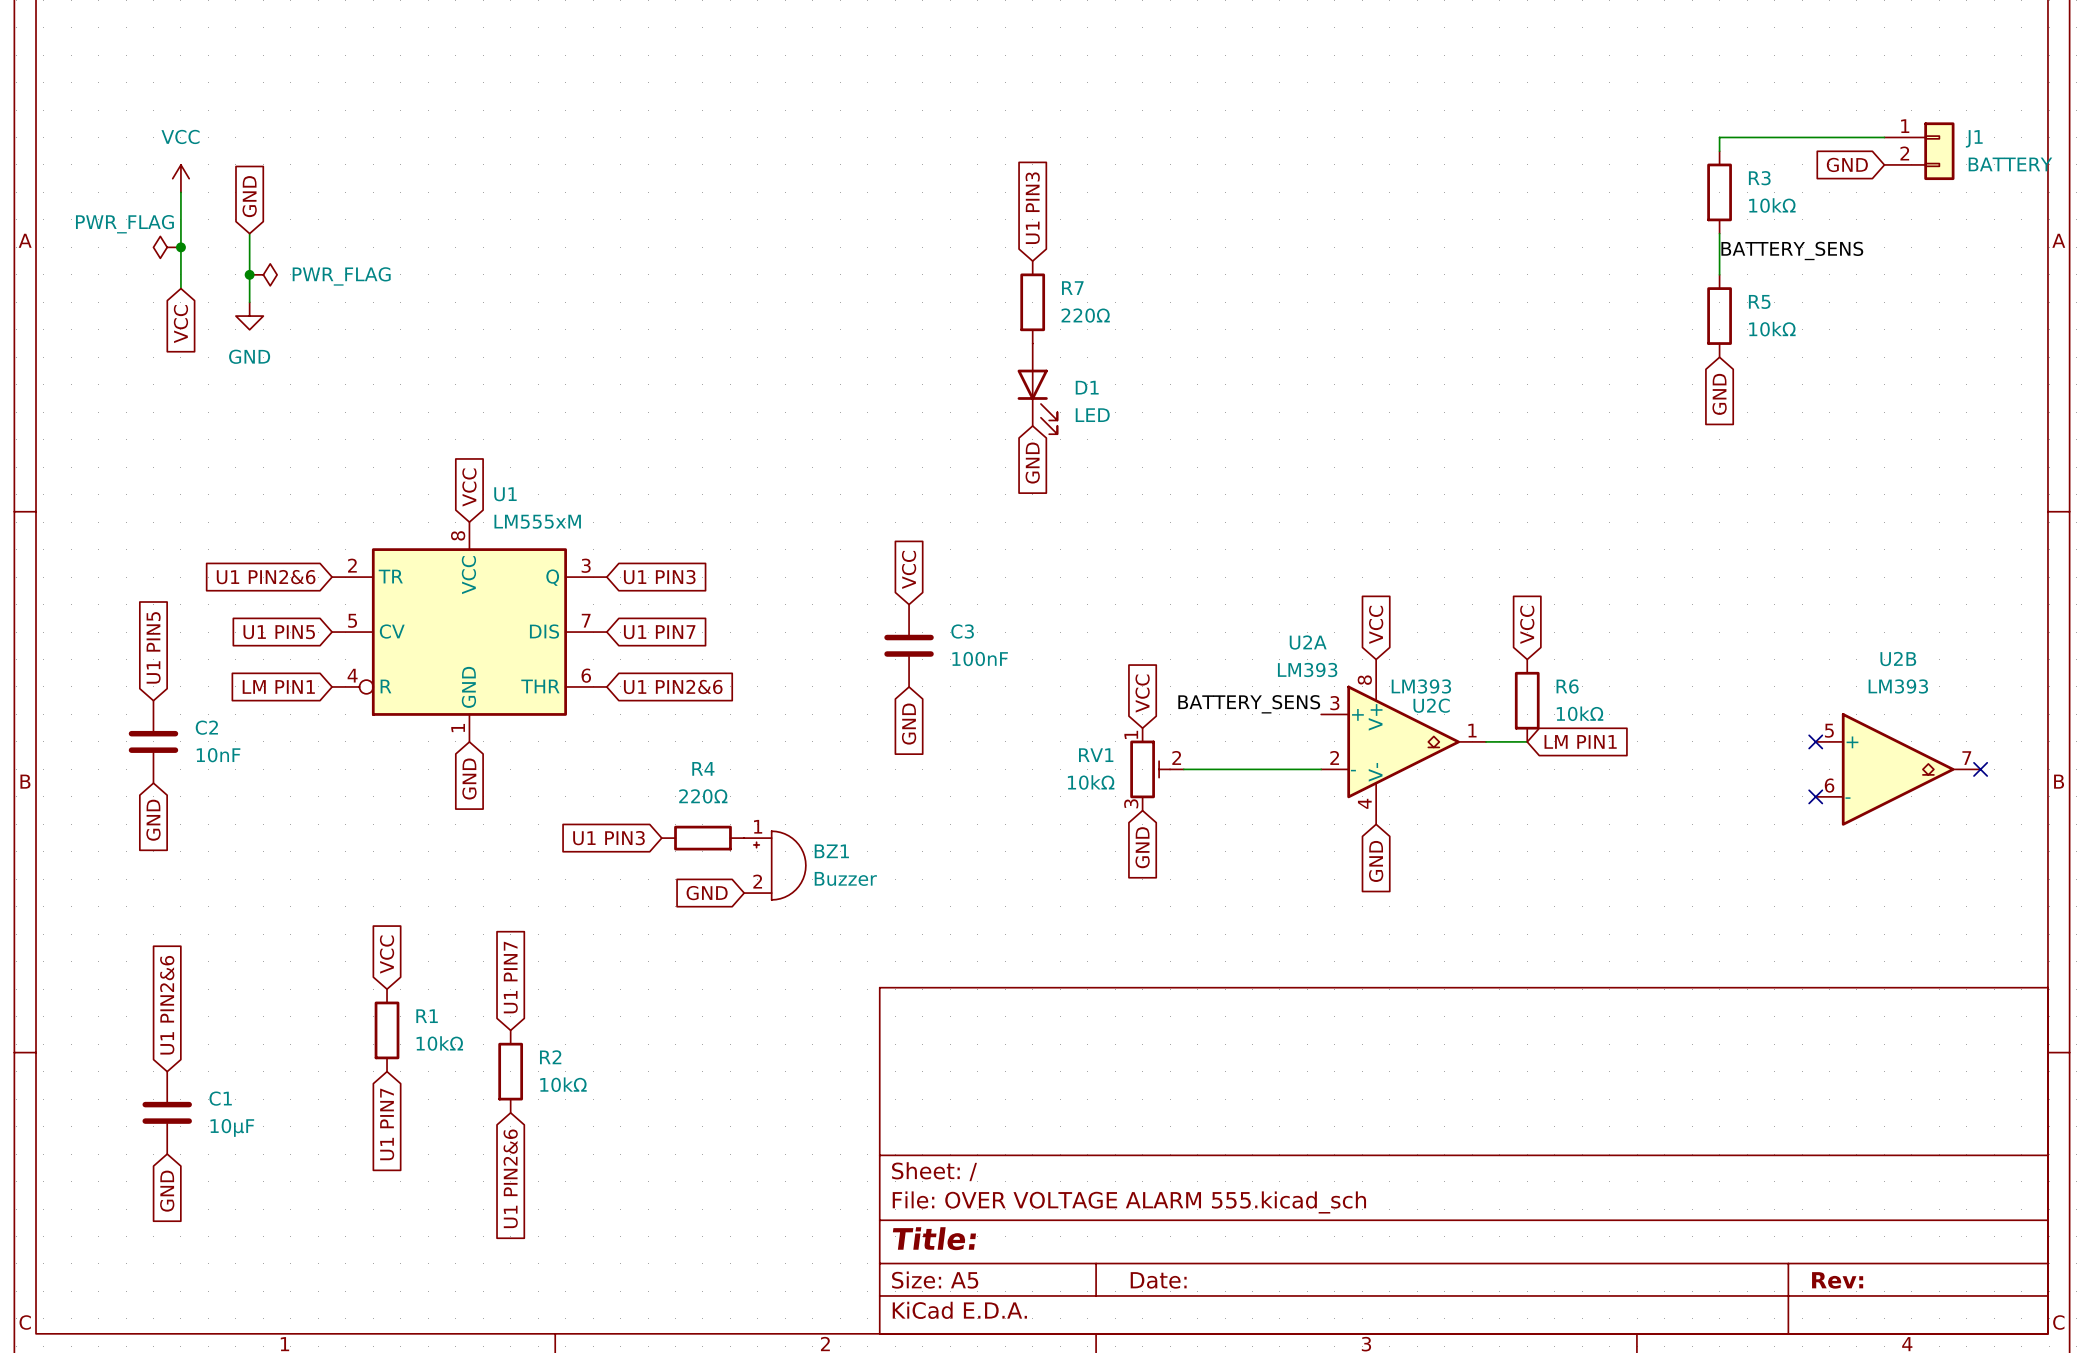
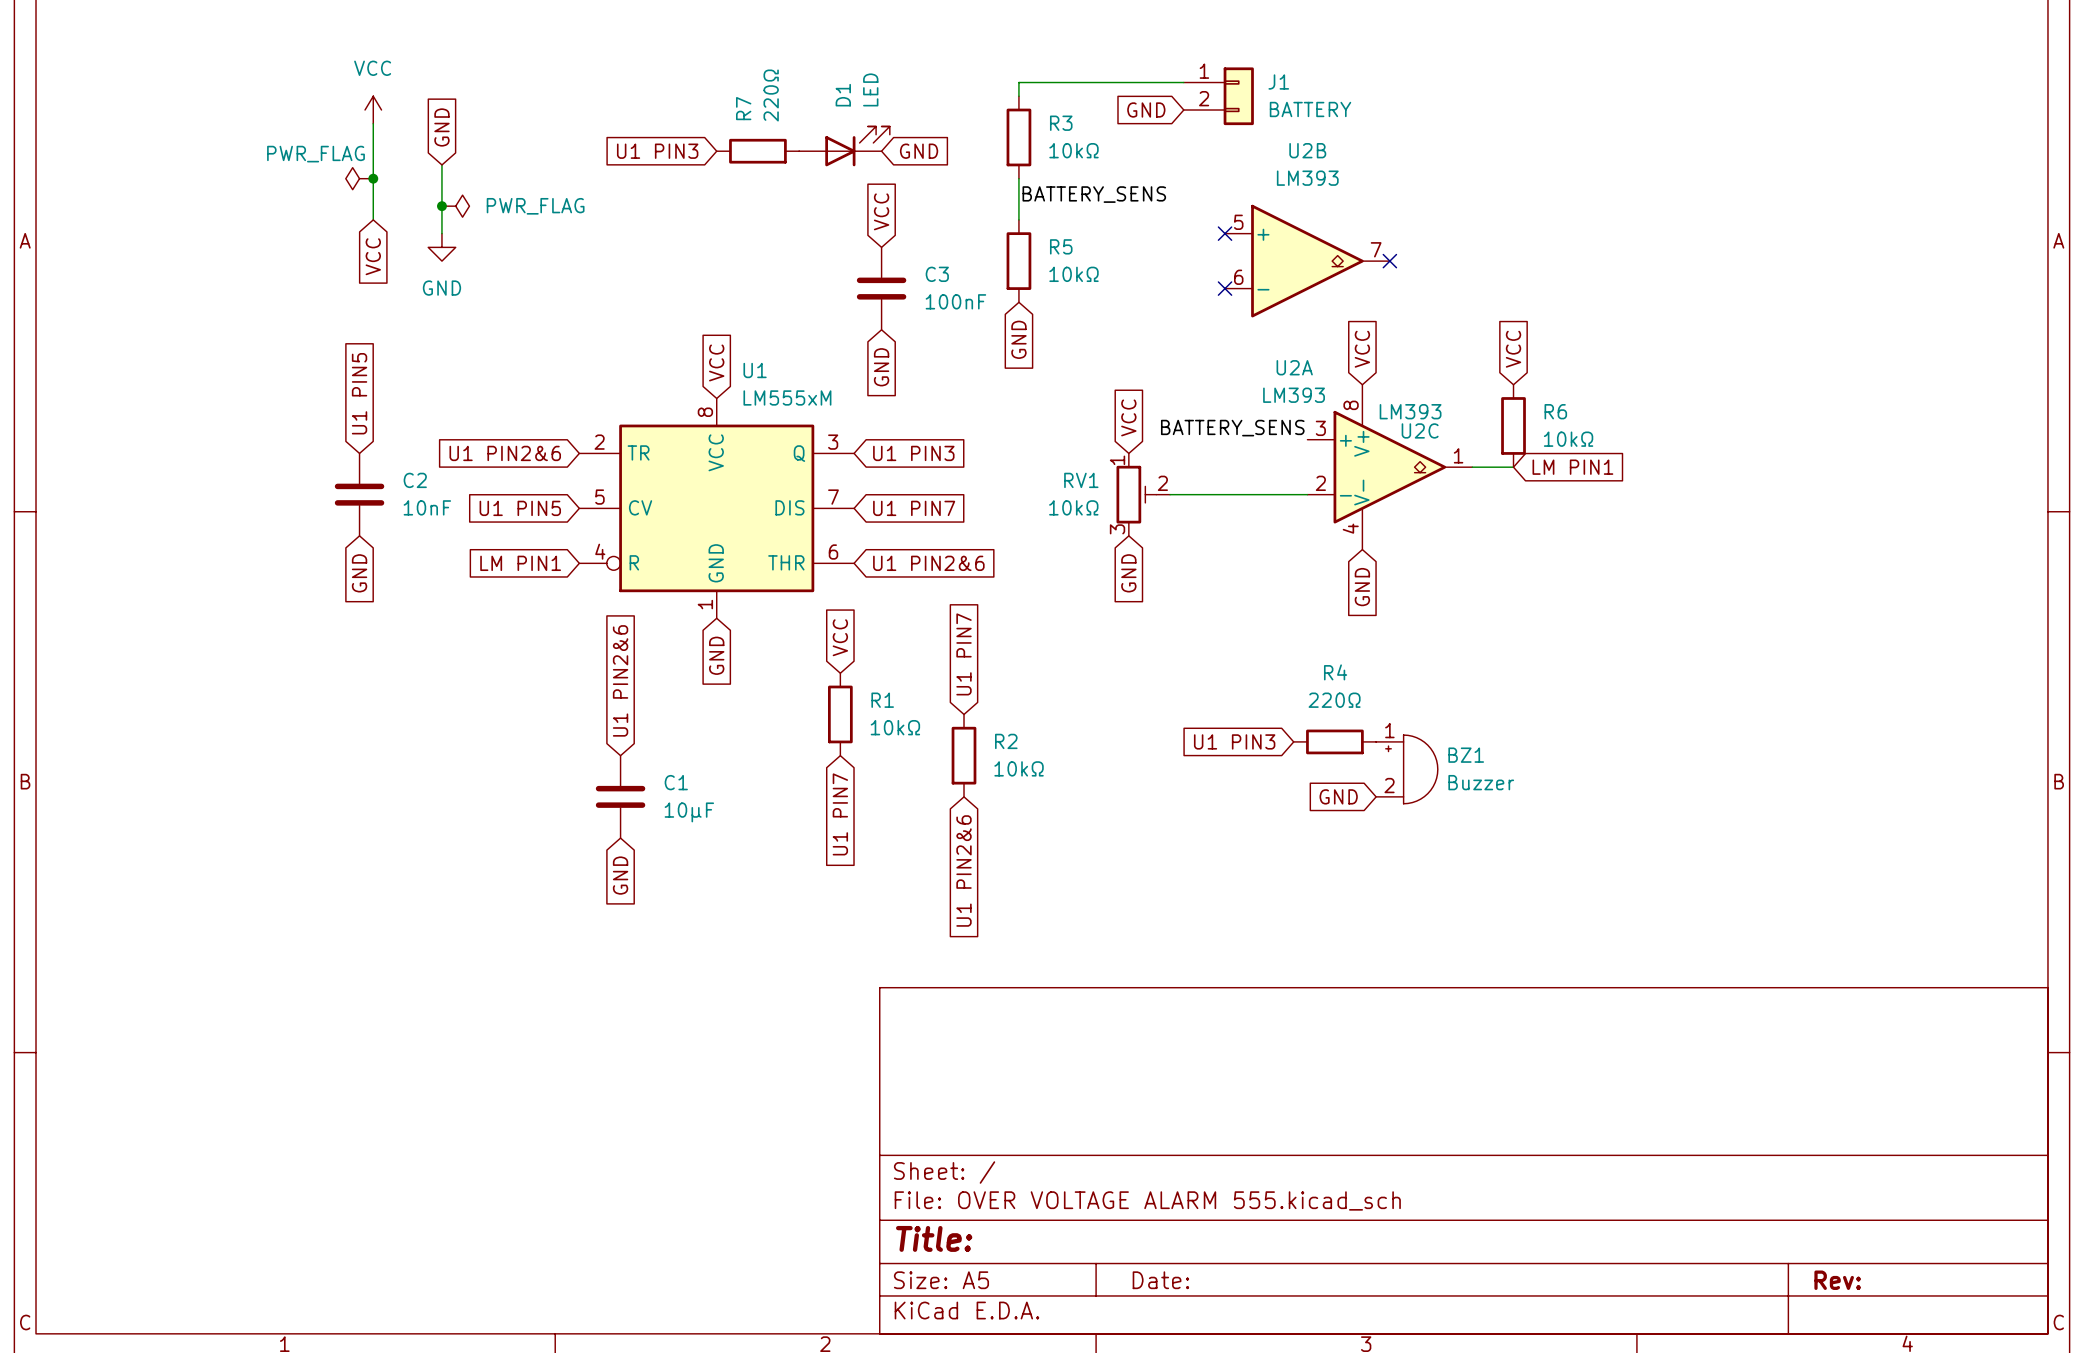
wire: none -> (1183, 82) (1018, 82) (1018, 96)
global label: none -> GND (1146, 110)
global label: none -> GND (441, 127)
wire: (1884, 137) (1719, 137) (1719, 151) -> none
global label: none -> U1 PIN3 (657, 151)
global label: none -> GND (919, 151)
J1 position: (1919, 151) -> (1218, 96)
global label: GND (1847, 164) -> none
power symbol position: VCC (180, 178) -> VCC (373, 110)
power symbol: none -> PWR_FLAG (359, 178)
junction: none -> (373, 178)
wire: (180, 192) (180, 288) -> (373, 123) (373, 219)
R3 position: (1719, 192) -> (1018, 137)
global label: GND (249, 196) -> none
label: none -> BATTERY_SENS (1094, 194)
junction: none -> (441, 206)
power symbol: none -> PWR_FLAG (455, 206)
global label: U1 PIN3 (1032, 208) -> none
global label: none -> VCC (881, 211)
wire: (249, 233) (249, 302) -> (441, 164) (441, 233)
no-connect mark: none -> (1225, 233)
wire: (1719, 233) (1719, 274) -> none
power symbol: PWR_FLAG (167, 247) -> none
junction: (180, 247) -> none
label: BATTERY_SENS (1792, 250) -> none
global label: none -> VCC (373, 256)
no-connect mark: none -> (1389, 261)
junction: (249, 274) -> none
power symbol: PWR_FLAG (263, 274) -> none
R7 name position: R7 (1072, 288) -> R7 (743, 108)
no-connect mark: none -> (1225, 288)
R7 rotation: 0° (1032, 302) -> 90° clockwise (757, 151)
R7 position: (1032, 302) -> (757, 151)
R7 value position: 220Ω (1085, 315) -> 220Ω (771, 95)
power symbol position: GND (249, 316) -> GND (441, 247)
R5 position: (1719, 316) -> (1018, 261)
global label: VCC (180, 324) -> none
global label: none -> GND (1018, 339)
global label: none -> VCC (1362, 349)
global label: none -> VCC (1513, 349)
global label: none -> VCC (716, 362)
global label: none -> GND (881, 367)
D1 position: (1037, 388) -> (844, 146)
global label: GND (1719, 394) -> none
global label: none -> U1 PIN5 (359, 393)
D1 rotation: 0° (1037, 401) -> 90° counterclockwise (857, 146)
global label: none -> VCC (1128, 417)
label: none -> BATTERY_SENS (1232, 428)
global label: none -> U1 PIN2&6 (505, 453)
global label: none -> U1 PIN3 (913, 453)
global label: GND (1032, 463) -> none
wire: none -> (1472, 467) (1513, 467)
global label: none -> LM PIN1 (1572, 467)
global label: VCC (469, 487) -> none
wire: none -> (1170, 494) (1307, 494)
global label: none -> U1 PIN5 (520, 508)
global label: none -> U1 PIN7 (914, 508)
global label: none -> LM PIN1 (520, 563)
global label: none -> U1 PIN2&6 (928, 563)
global label position: VCC (909, 569) -> VCC (840, 637)
global label: none -> GND (359, 573)
global label: none -> GND (1128, 573)
global label: U1 PIN2&6 (266, 577) -> none
global label: U1 PIN3 (659, 577) -> none
global label: none -> GND (1362, 587)
global label: VCC (1376, 624) -> none
global label: VCC (1527, 624) -> none
global label: U1 PIN5 (279, 632) -> none
U1 position: (469, 632) -> (716, 508)
global label: U1 PIN7 (659, 632) -> none
C3 position: (909, 645) -> (881, 288)
global label: U1 PIN5 (153, 647) -> none
global label: none -> GND (716, 655)
global label: none -> U1 PIN7 (964, 654)
global label: LM PIN1 (278, 686) -> none
global label rotation: 0° (673, 686) -> 90° counterclockwise (620, 680)
global label: VCC (1142, 693) -> none
R6 position: (1527, 700) -> (1513, 425)
label: BATTERY_SENS (1249, 704) -> none
global label: GND (909, 724) -> none
C2 position: (153, 741) -> (359, 494)
global label: none -> U1 PIN3 (1234, 741)
U2C position: (1376, 741) -> (1362, 467)
U2A position: (1403, 741) -> (1389, 467)
wire: (1486, 741) (1527, 741) -> none
global label: LM PIN1 (1580, 741) -> none
no-connect mark: (1815, 741) -> none
RV1 position: (1157, 769) -> (1143, 494)
wire: (1183, 769) (1321, 769) -> none
U2B position: (1898, 769) -> (1307, 261)
no-connect mark: (1980, 769) -> none
global label: GND (469, 779) -> none
no-connect mark: (1815, 796) -> none
global label: none -> U1 PIN7 (840, 814)
global label: GND (153, 820) -> none
global label: U1 PIN3 (608, 838) -> none
R4 position: (702, 838) -> (1334, 741)
global label: GND (1142, 847) -> none
global label rotation: 0° (1376, 861) -> 90° clockwise (1338, 796)
global label: none -> U1 PIN2&6 (964, 870)
BZ1 position: (775, 865) -> (1406, 769)
global label: none -> GND (620, 875)
global label: GND (707, 893) -> none
global label: VCC (387, 954) -> none
global label: U1 PIN7 (510, 977) -> none
global label: U1 PIN2&6 (167, 1005) -> none
R1 position: (387, 1030) -> (840, 714)
R2 position: (510, 1071) -> (964, 755)
C1 position: (167, 1112) -> (620, 796)
global label: U1 PIN7 (387, 1124) -> none
global label: U1 PIN2&6 (510, 1178) -> none
global label: GND (167, 1191) -> none

